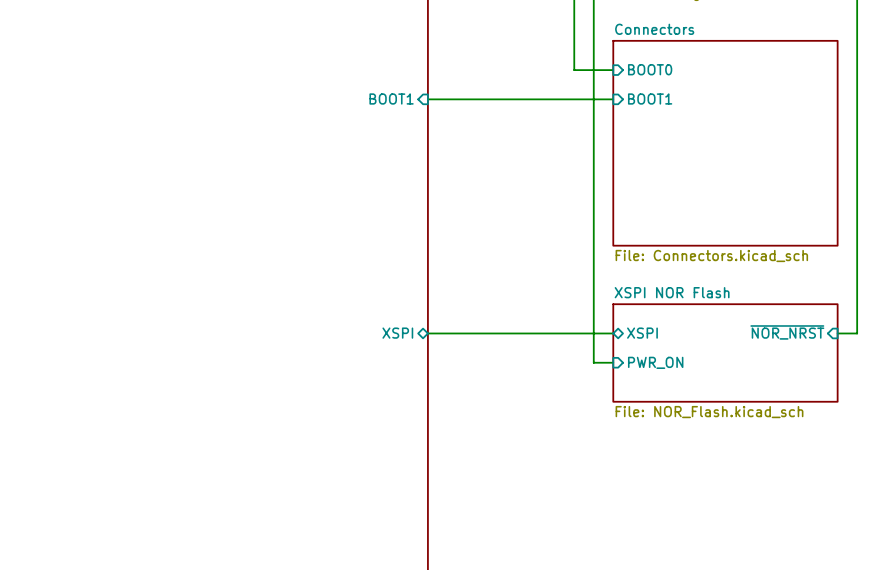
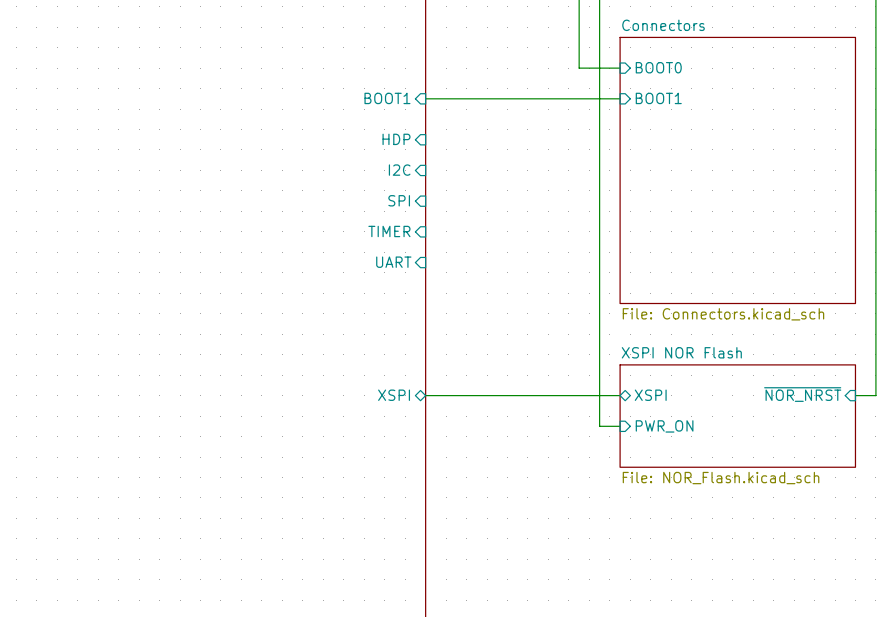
sheet pin: none -> HDP (396, 139)
sheet Connectors: File: Connectors.kicad_sch (725, 143) -> none
sheet pin: none -> I2C (399, 170)
sheet Connectors: none -> File: Connectors.kicad_sch (737, 170)
sheet pin: none -> SPI (399, 200)
sheet pin: none -> TIMER (389, 231)
sheet pin: none -> UART (393, 262)
sheet pin position: ~{NOR_NRST} (787, 332) -> ~{NOR_NRST} (802, 394)
sheet pin position: XSPI (397, 333) -> XSPI (394, 395)
wire: (427, 333) (613, 333) -> (425, 395) (620, 395)
sheet pin position: XSPI (642, 333) -> XSPI (650, 395)
wire: (837, 333) (857, 333) -> (855, 395) (875, 395) (875, 344)
sheet XSPI NOR Flash position: (725, 352) -> (737, 416)
wire: (593, 362) (613, 362) -> (599, 375) (599, 426) (620, 426)
sheet pin position: PWR_ON (655, 362) -> PWR_ON (664, 426)

